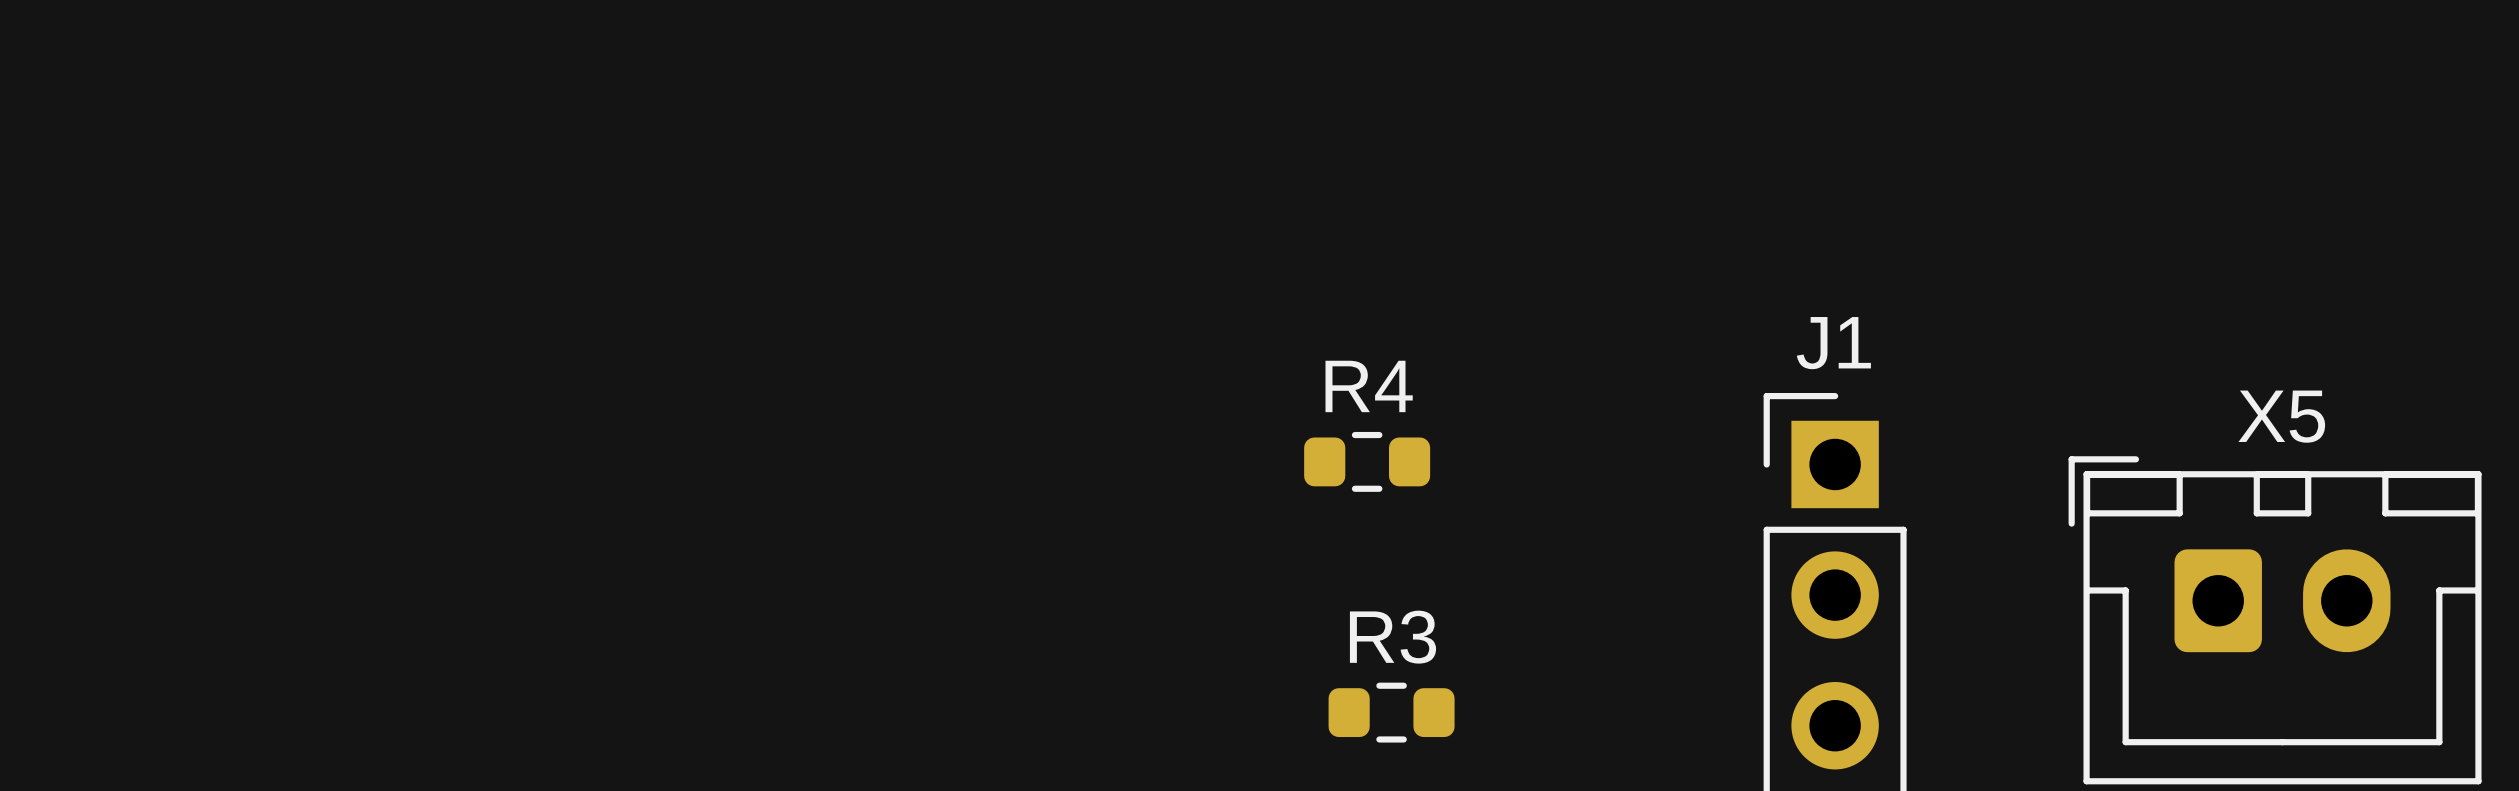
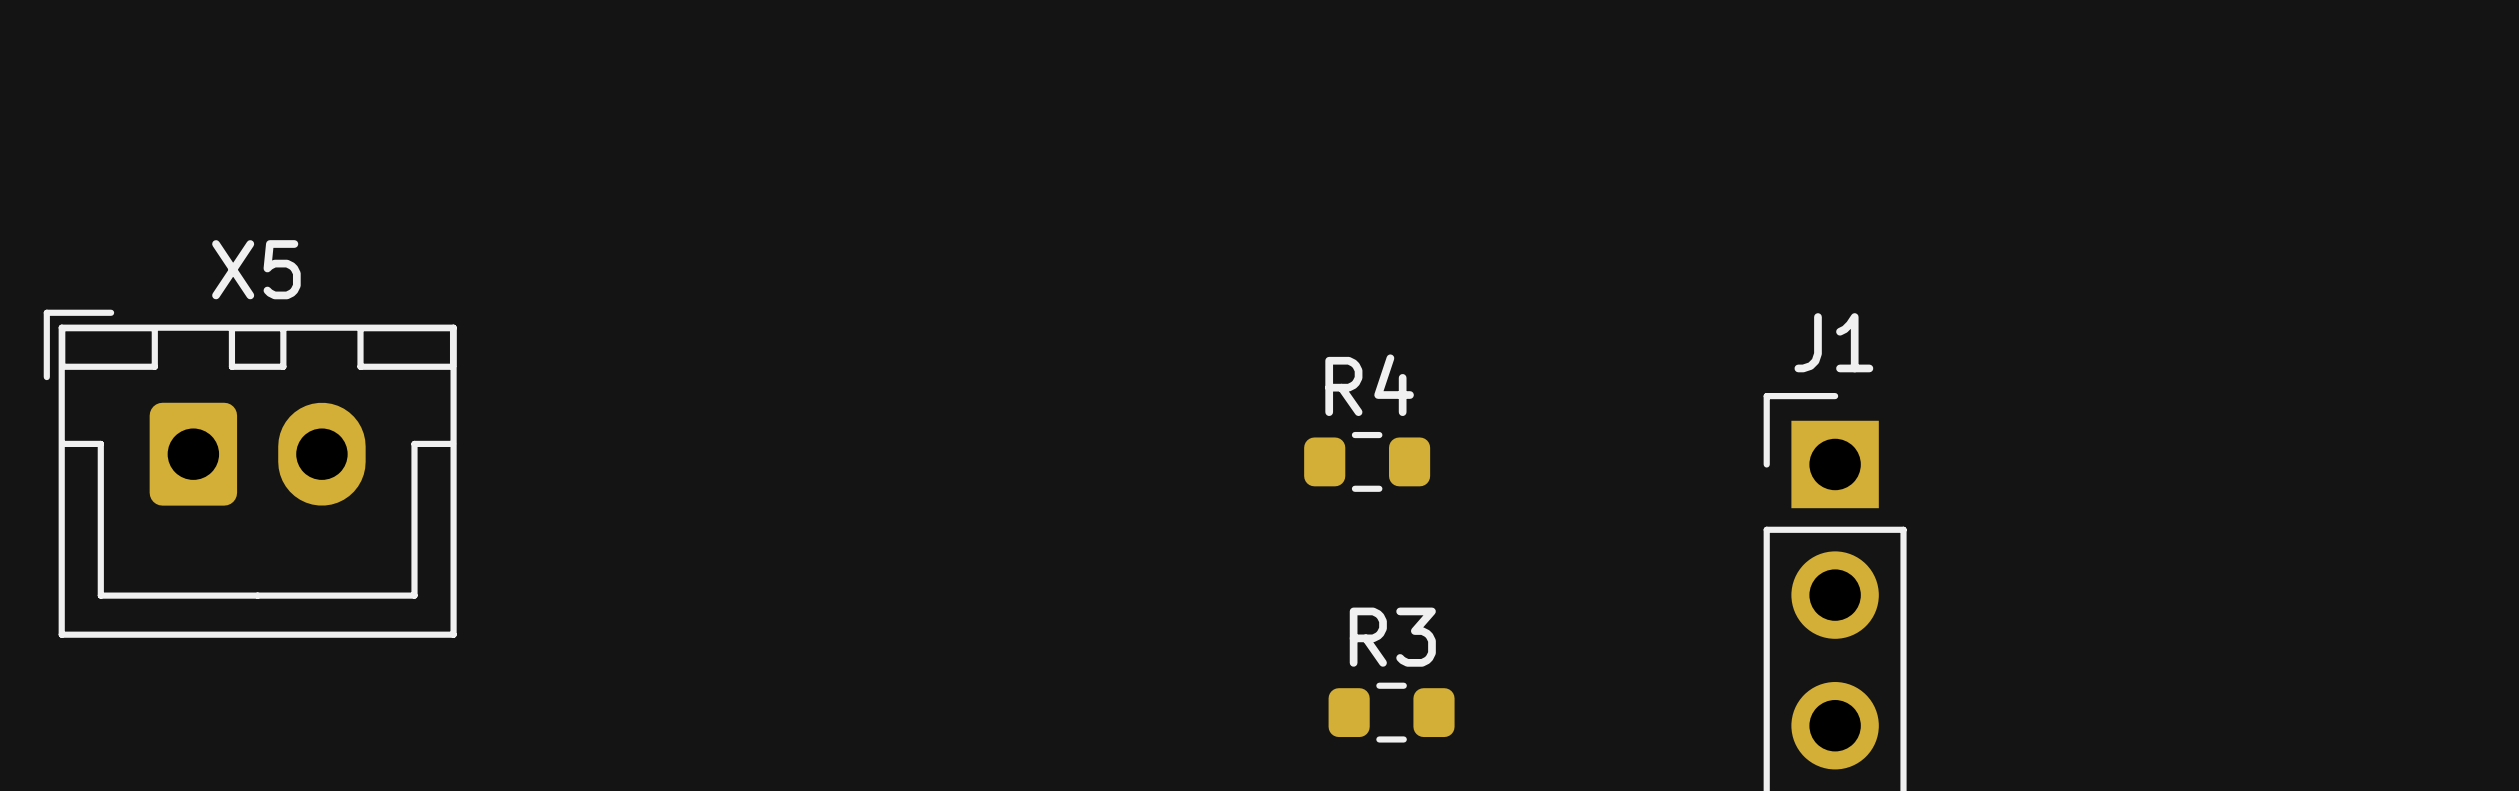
X5 position: (2275, 620) -> (250, 473)

